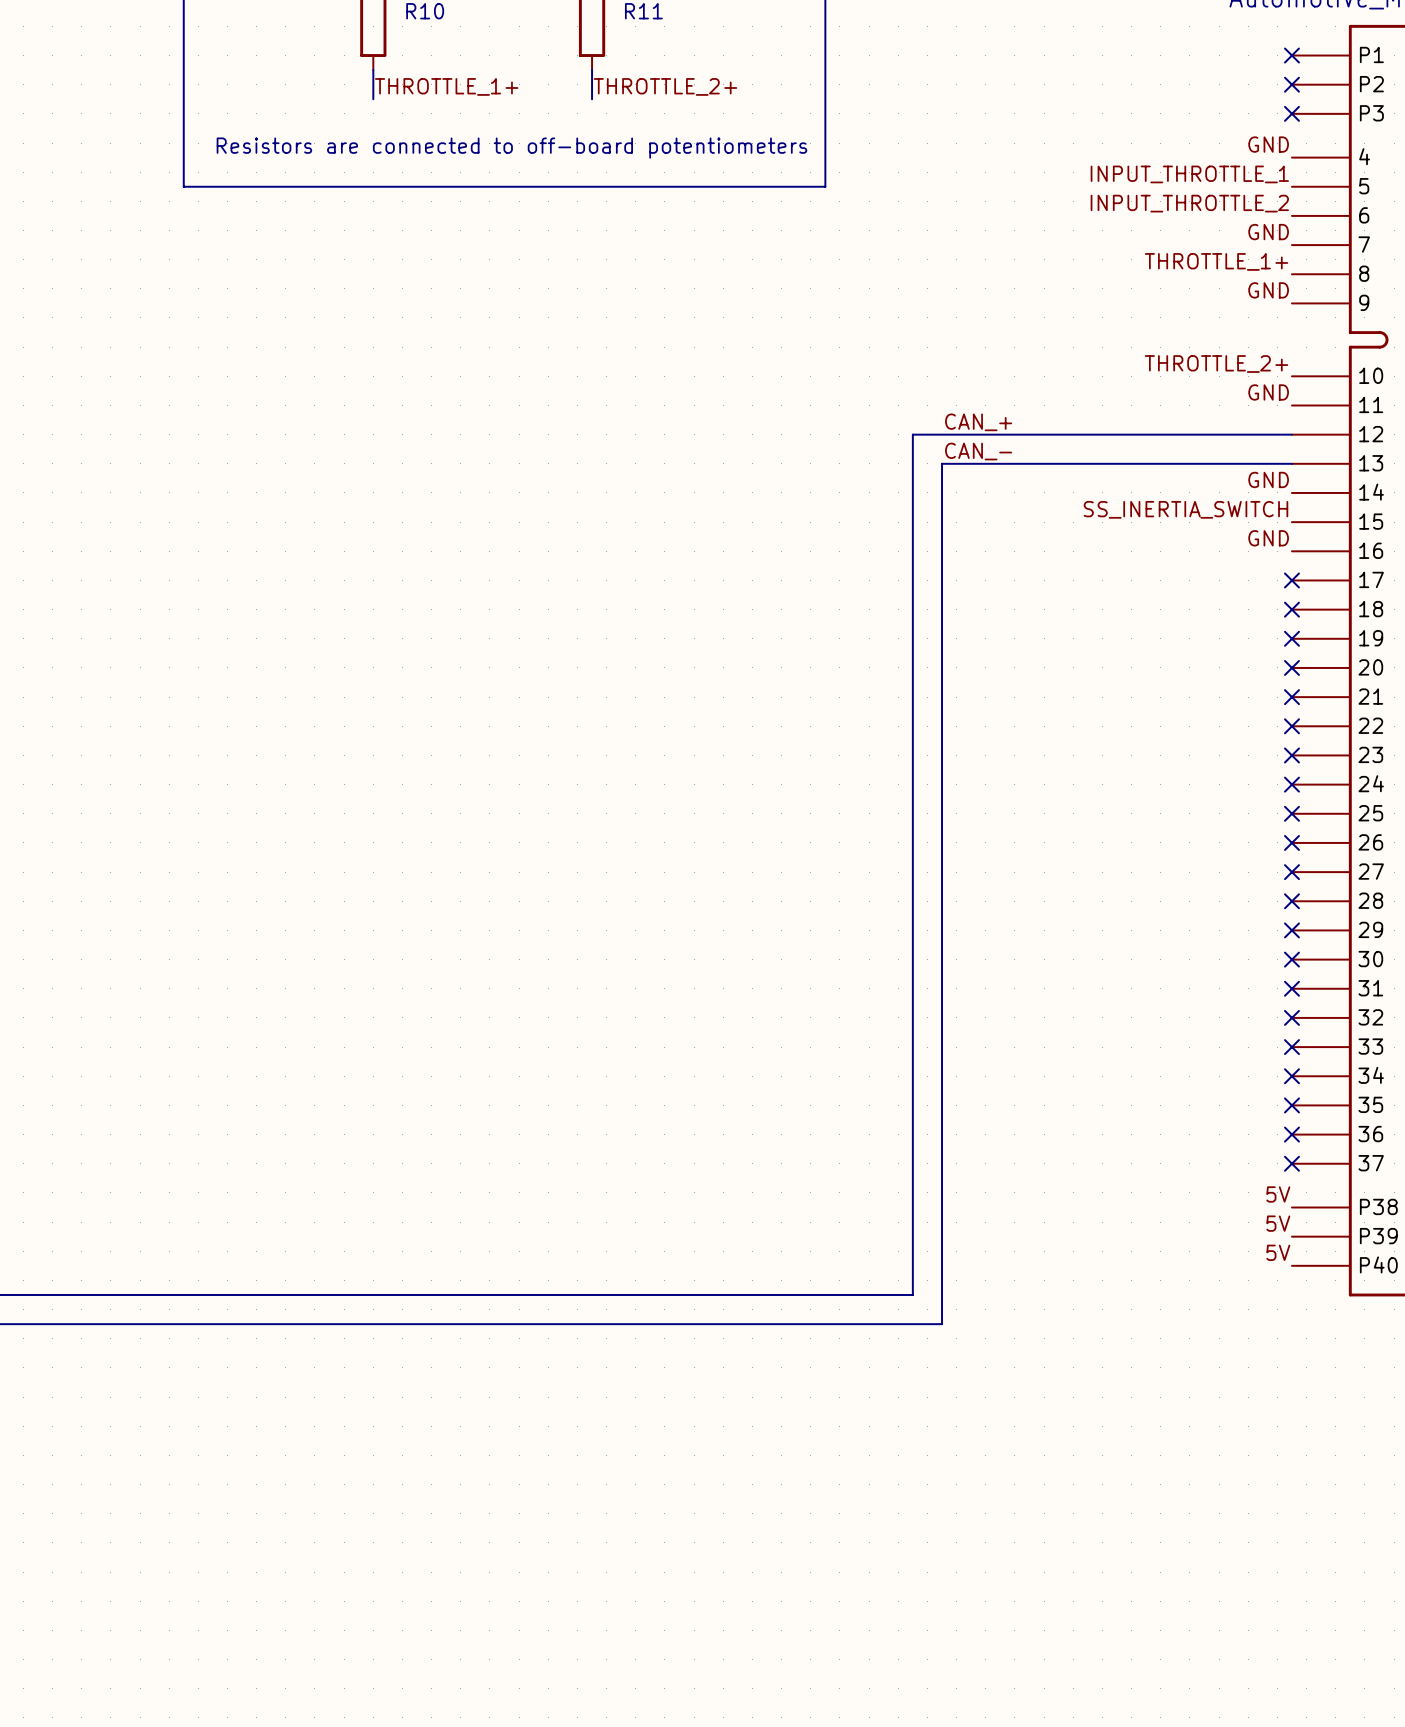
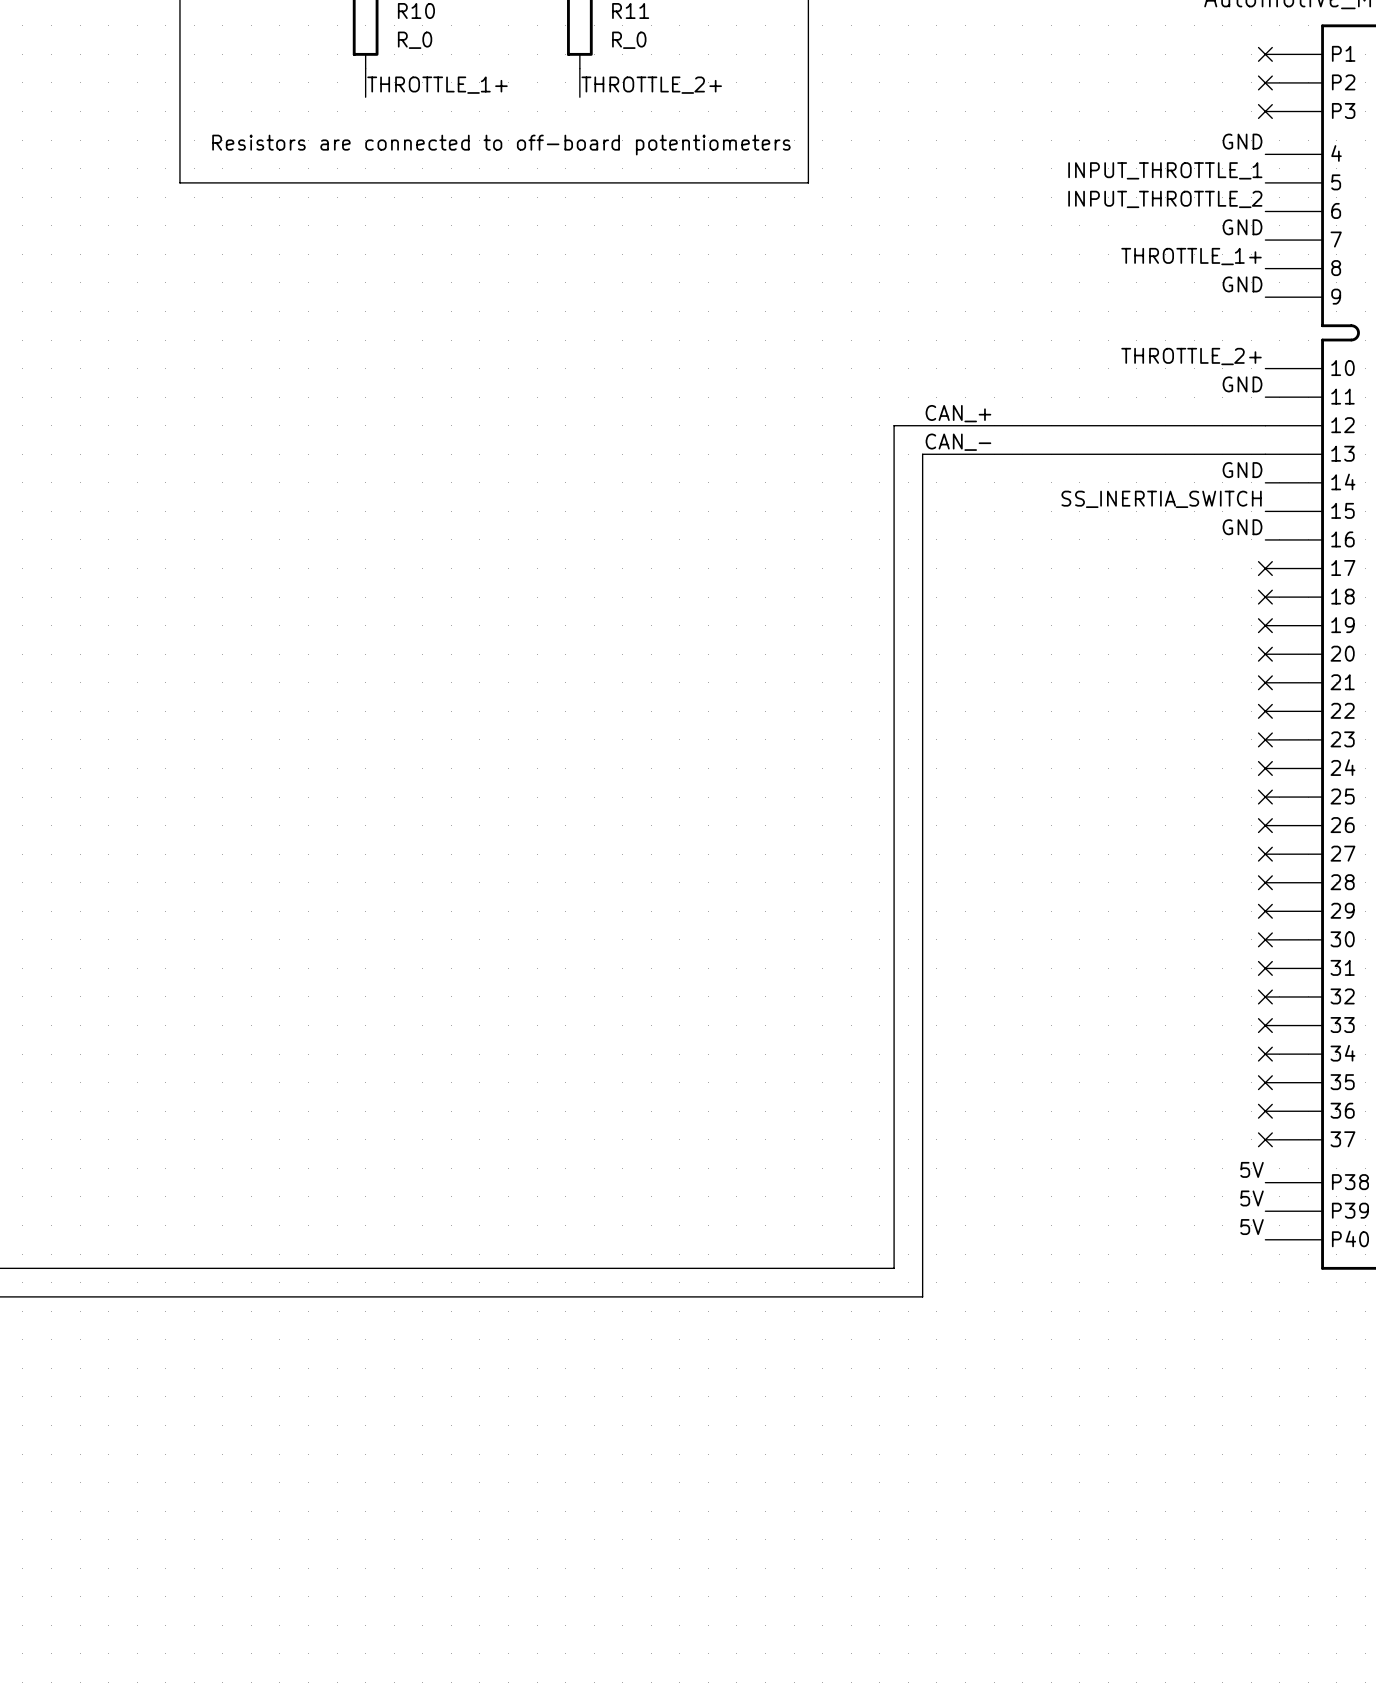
R10 value: none -> R_0 (415, 40)
R11 value: none -> R_0 (629, 40)

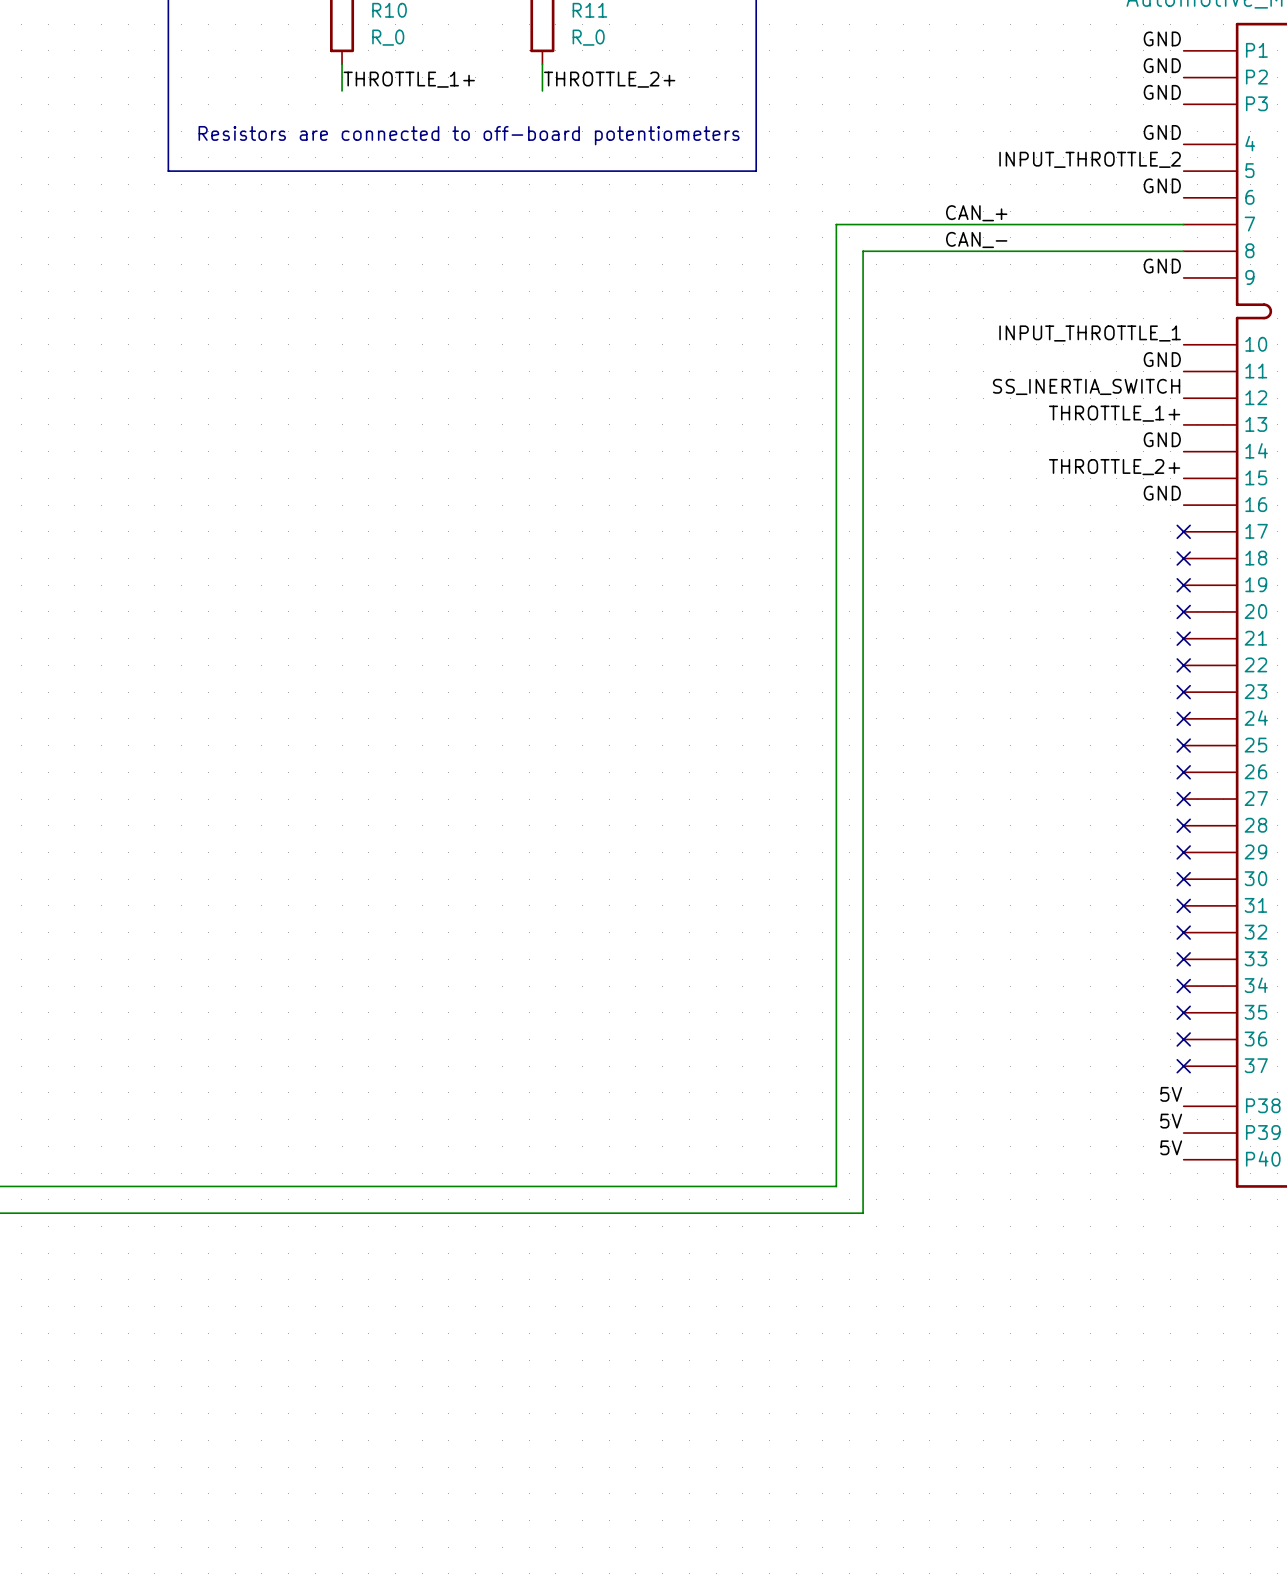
label: none -> GND (1162, 38)
no-connect mark: (1265, 54) -> none
label: none -> GND (1162, 65)
no-connect mark: (1265, 82) -> none
label: none -> GND (1162, 92)
no-connect mark: (1265, 111) -> none
label: INPUT_THROTTLE_1 (1165, 170) -> INPUT_THROTTLE_2 (1090, 159)
label: INPUT_THROTTLE_2 (1165, 199) -> GND (1162, 185)
label: GND (1242, 227) -> none
label position: THROTTLE_1+ (1191, 256) -> THROTTLE_1+ (1114, 413)
label: THROTTLE_2+ (1191, 356) -> INPUT_THROTTLE_1 (1090, 333)
label position: CAN_+ (958, 413) -> CAN_+ (976, 213)
label: none -> SS_INERTIA_SWITCH (1086, 386)
wire: (894, 425) (1265, 425) -> (836, 398) (836, 224) (1183, 224)
label position: CAN_- (958, 442) -> CAN_- (976, 239)
wire: (922, 454) (1265, 454) -> (863, 424) (863, 251) (1183, 251)
label: SS_INERTIA_SWITCH (1161, 499) -> THROTTLE_2+ (1114, 467)

